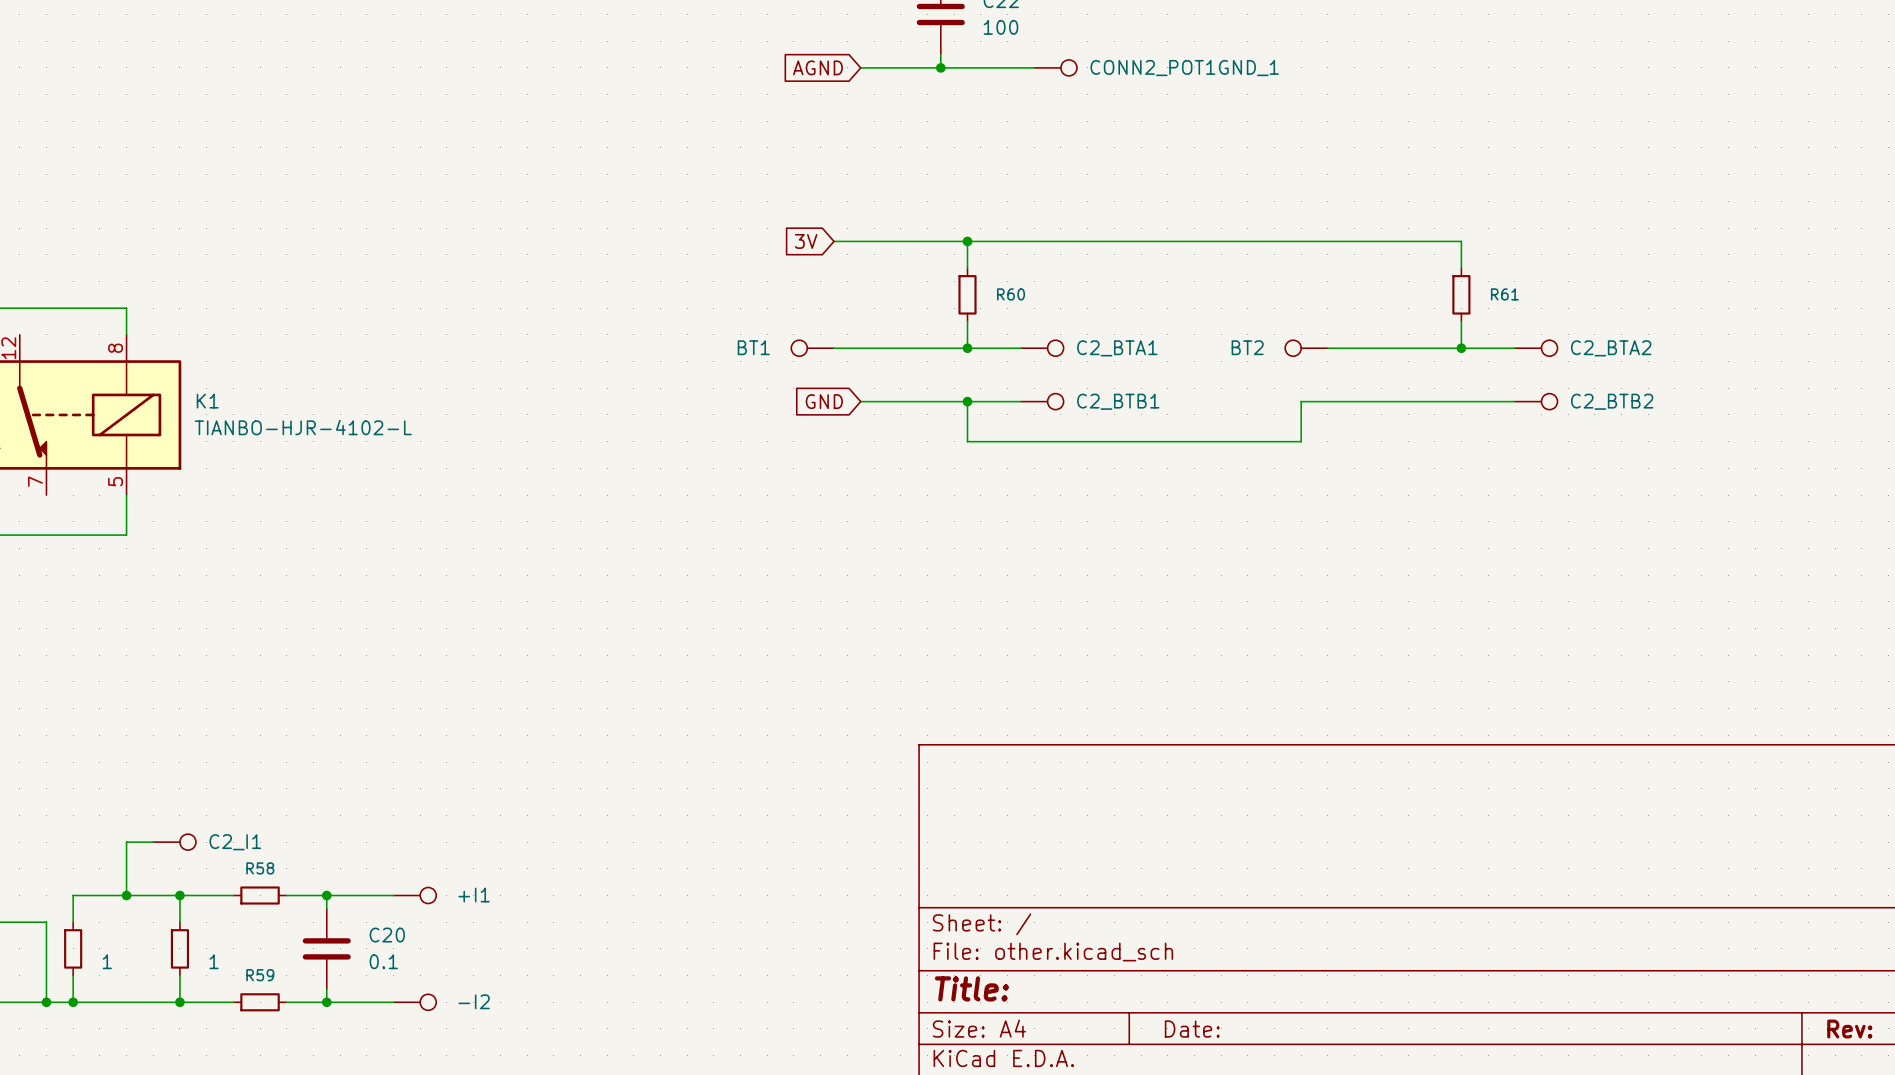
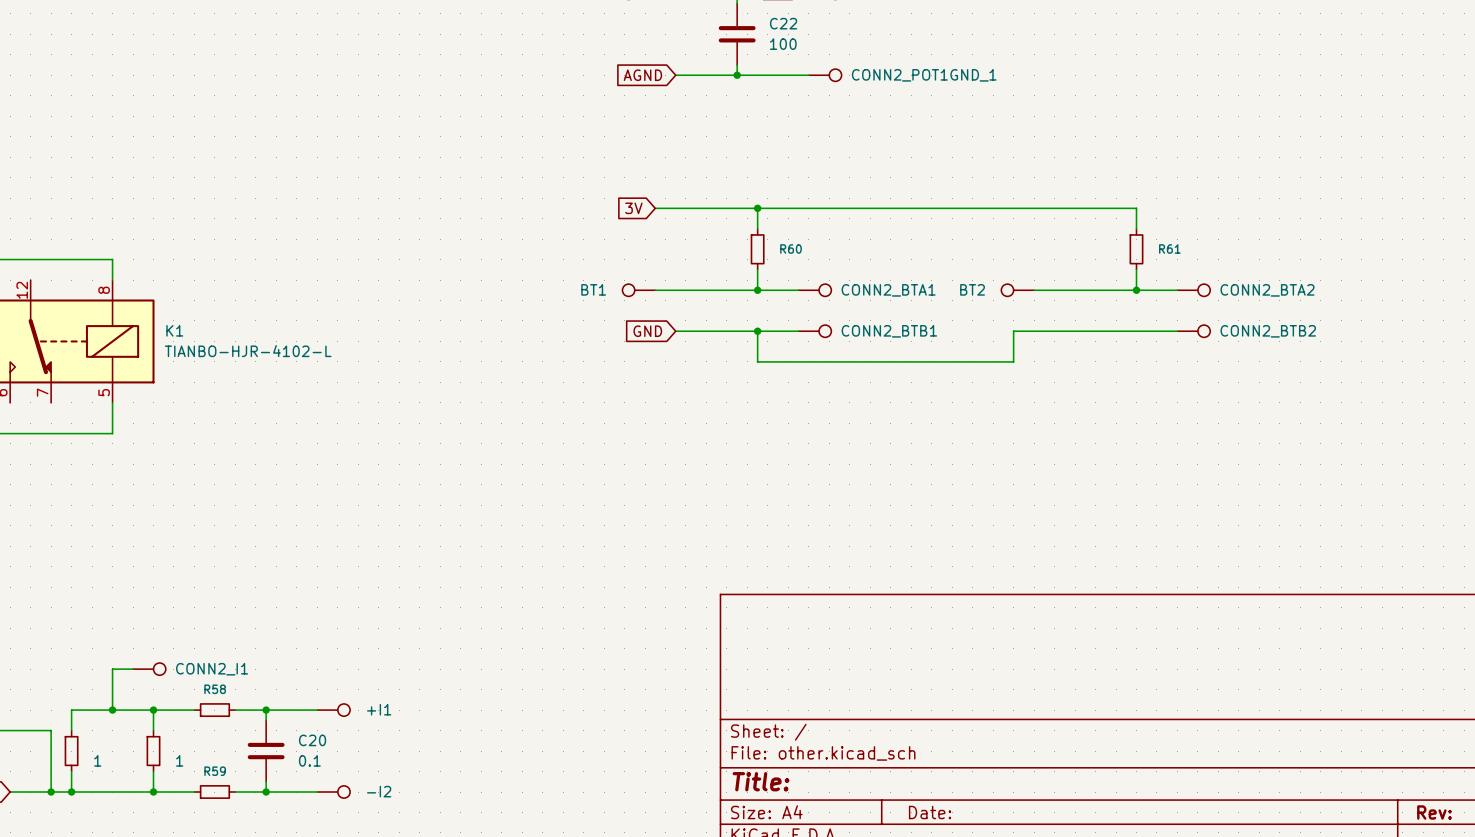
C2_BTA1 name: C2_BTA1 (1117, 348) -> CONN2_BTA1 (888, 290)
C2_BTA2 name: C2_BTA2 (1611, 348) -> CONN2_BTA2 (1267, 290)
C2_BTB1 name: C2_BTB1 (1118, 401) -> CONN2_BTB1 (889, 331)
C2_BTB2 name: C2_BTB2 (1612, 401) -> CONN2_BTB2 (1268, 331)
C2_I1 name: C2_I1 (235, 842) -> CONN2_I1 (212, 669)

